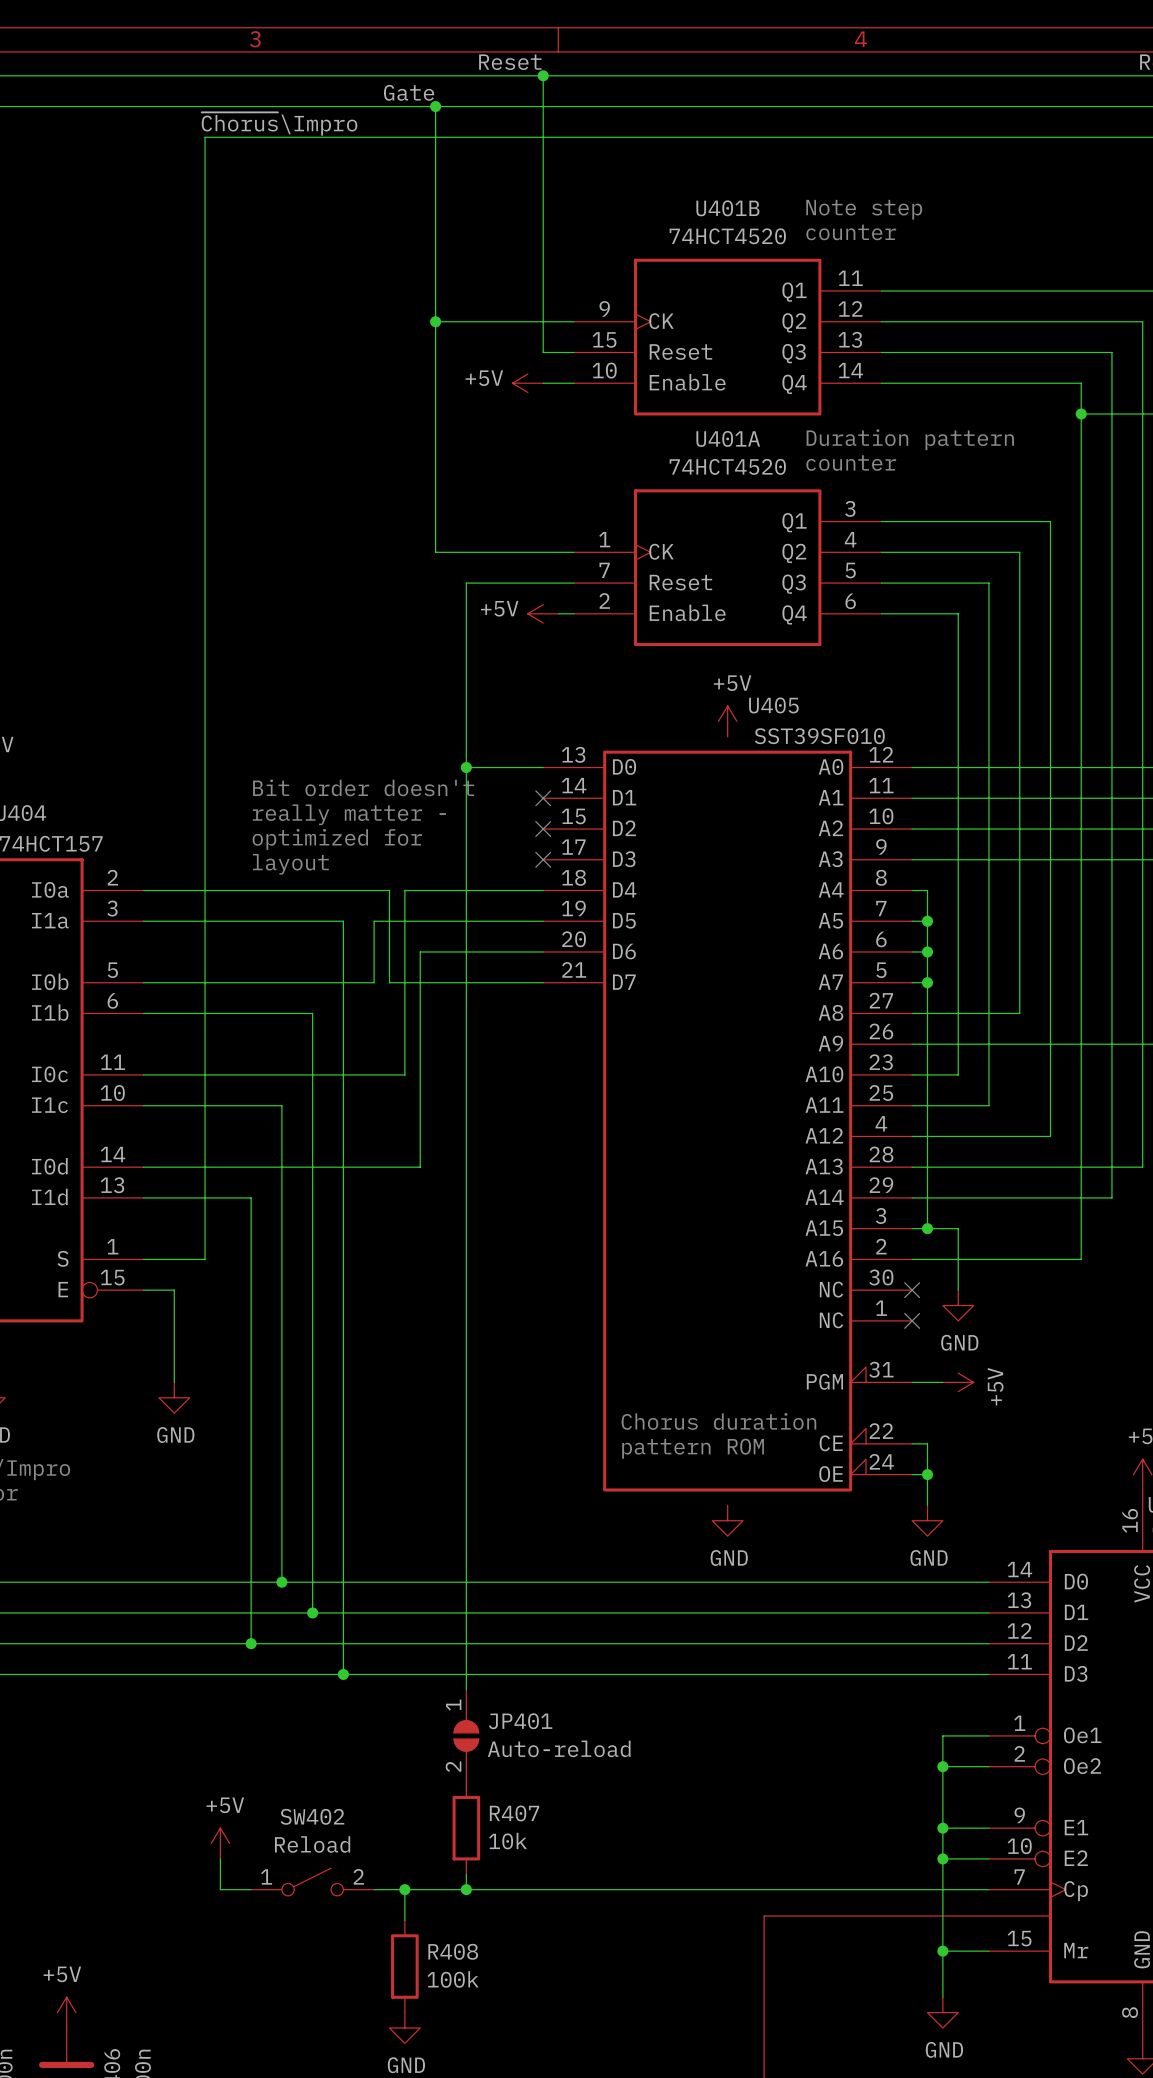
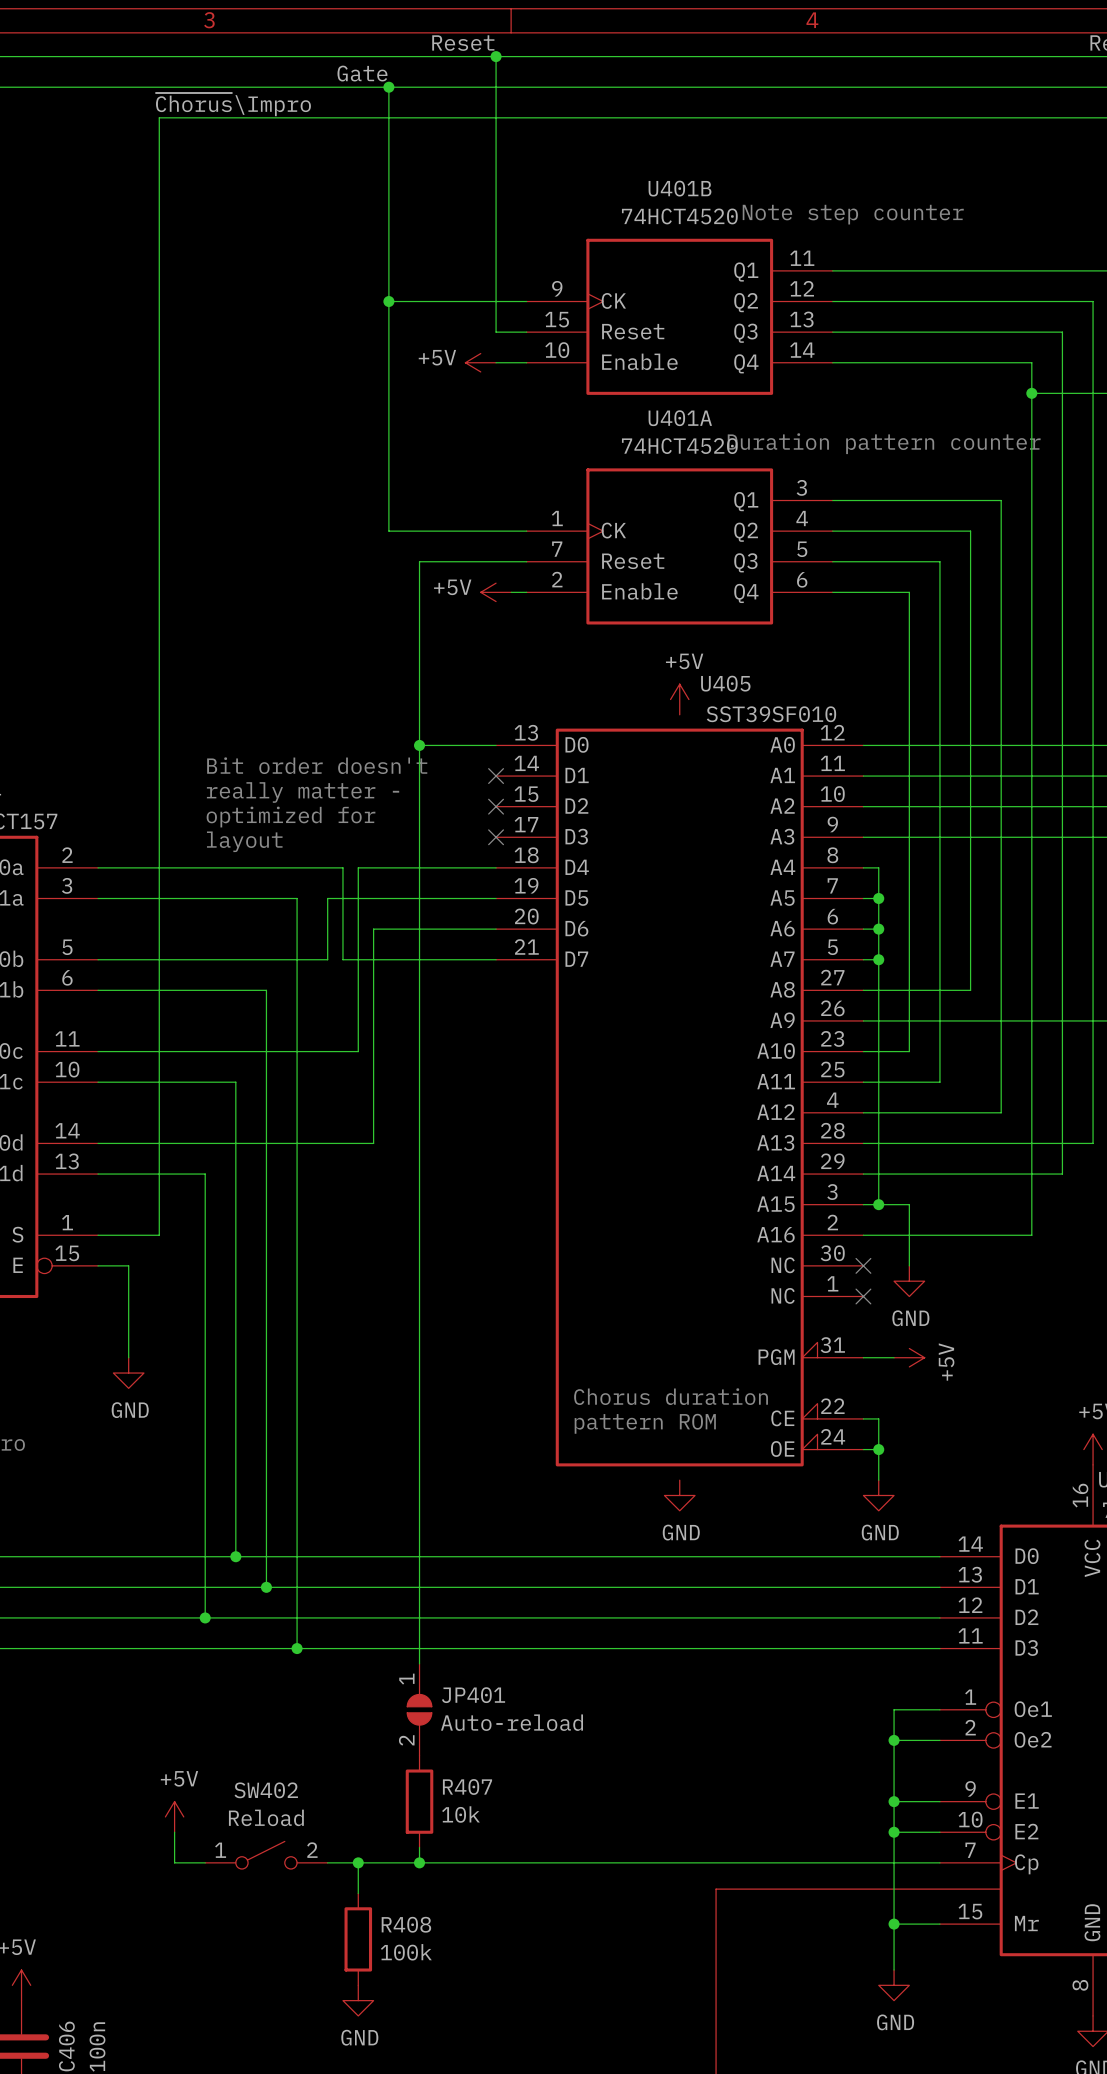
text: Note step (864, 209) -> Note step counter (853, 214)
text: counter (851, 232) -> none
text: Duration pattern (910, 439) -> Duration pattern counter (884, 443)
text: counter (851, 463) -> none

